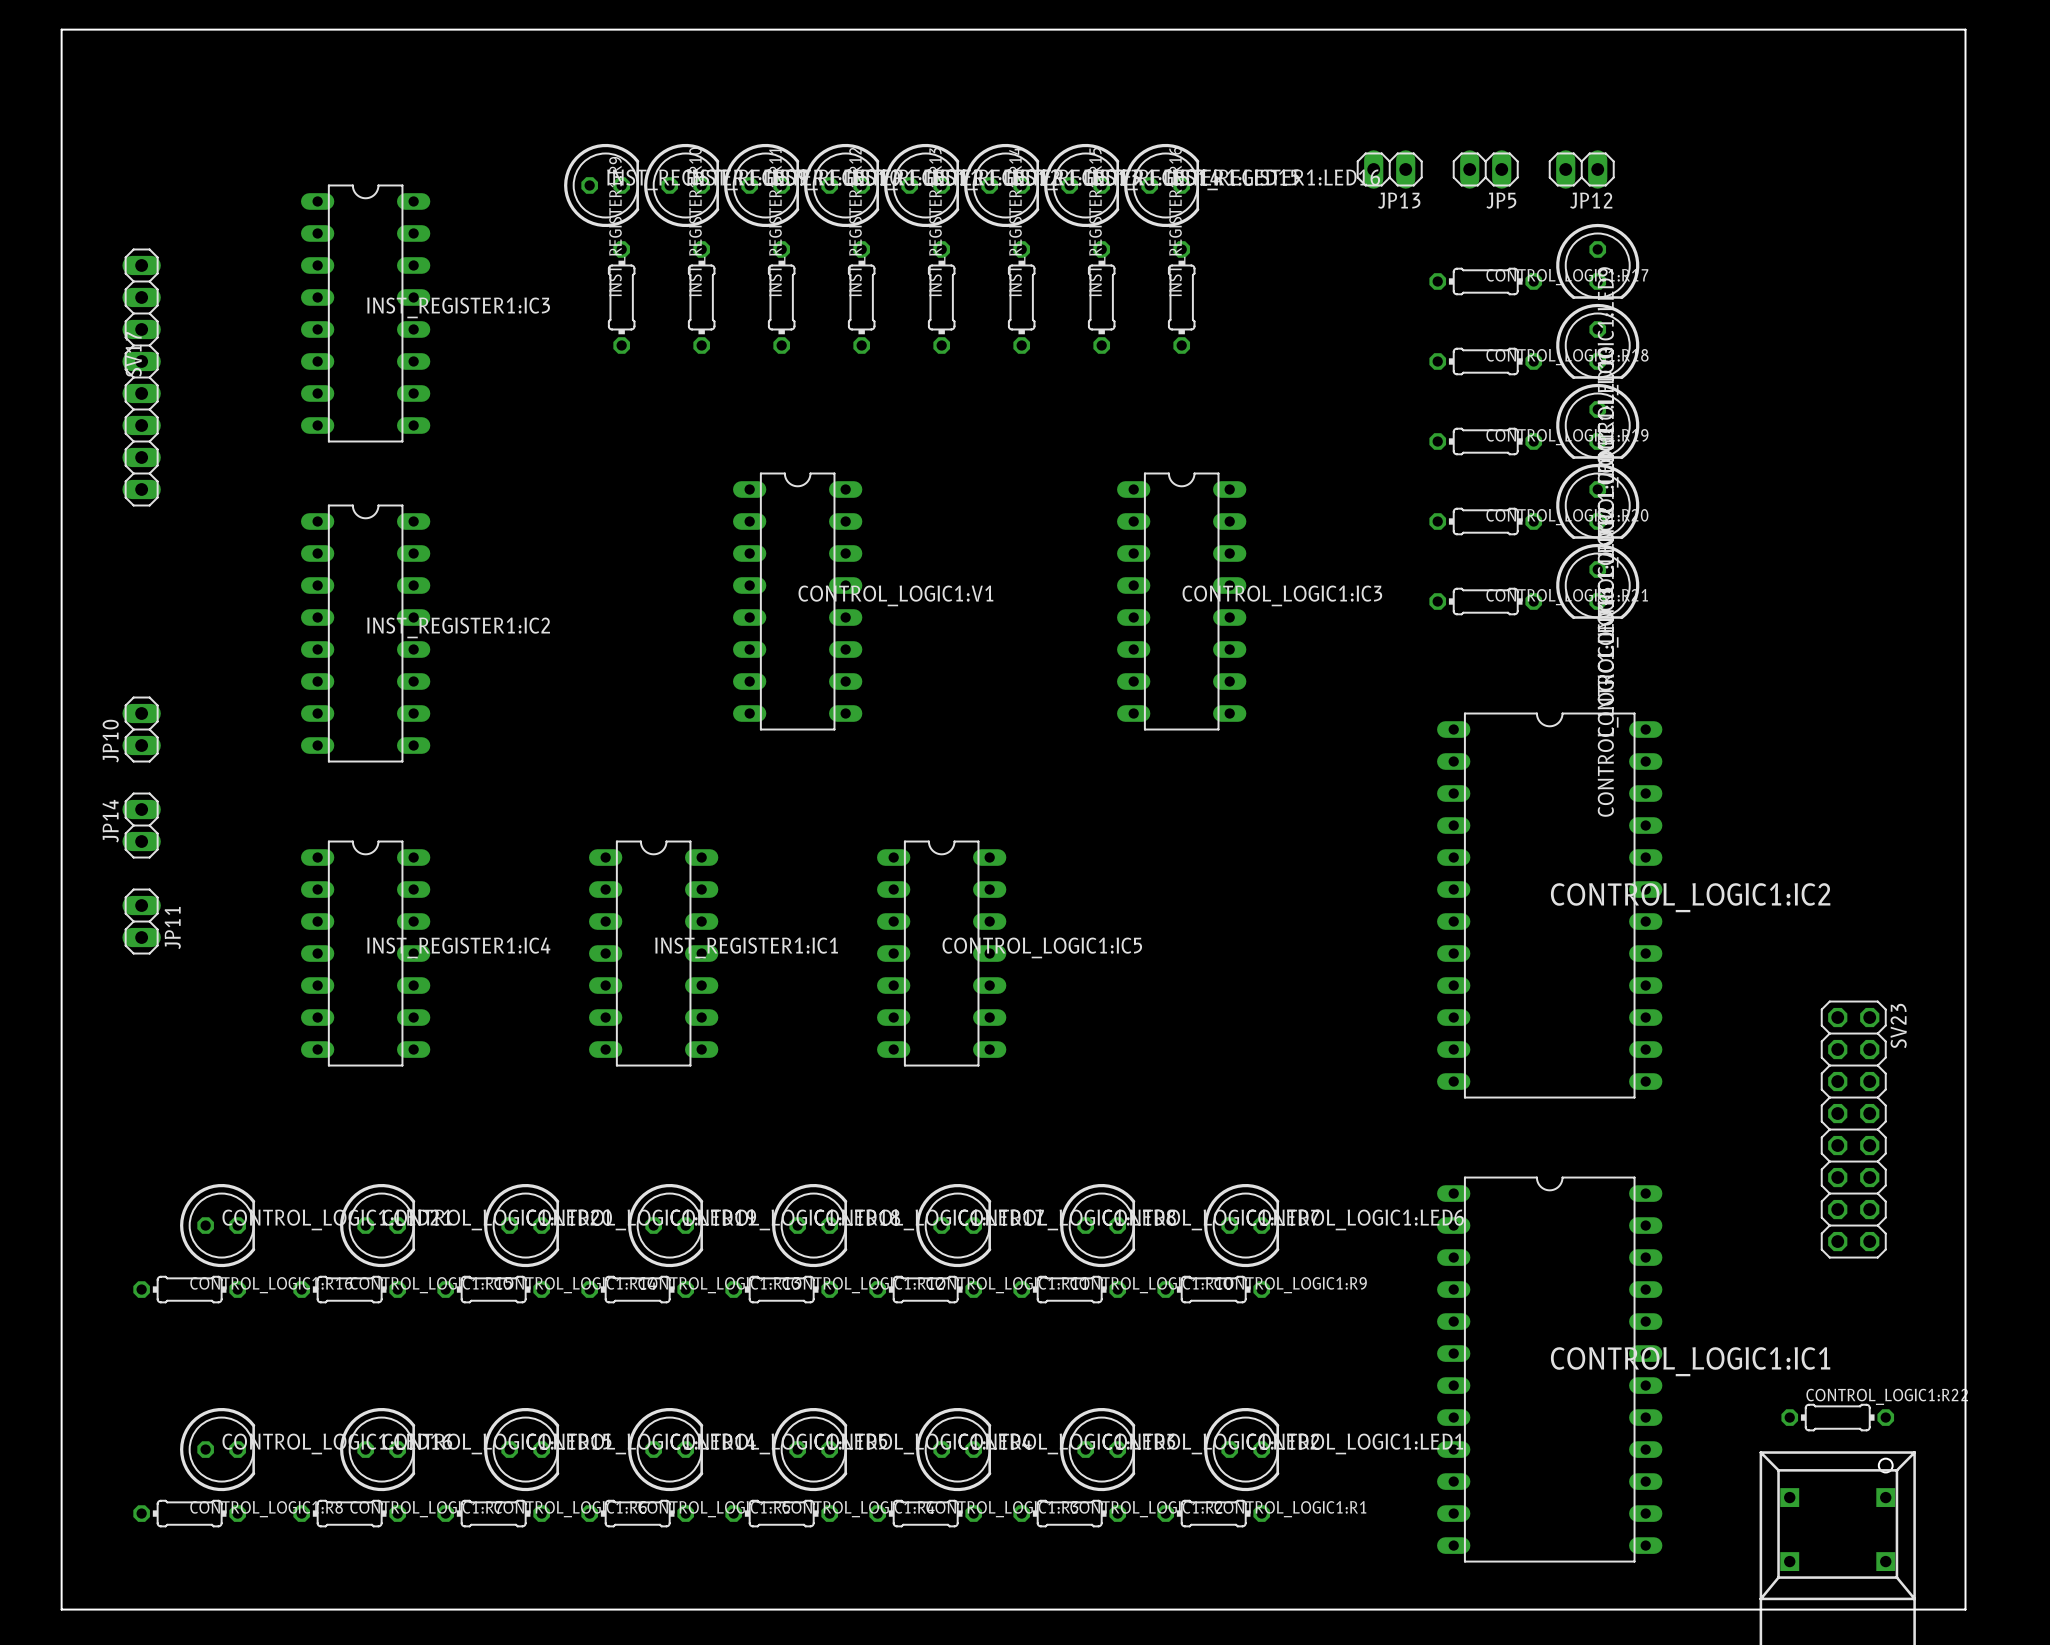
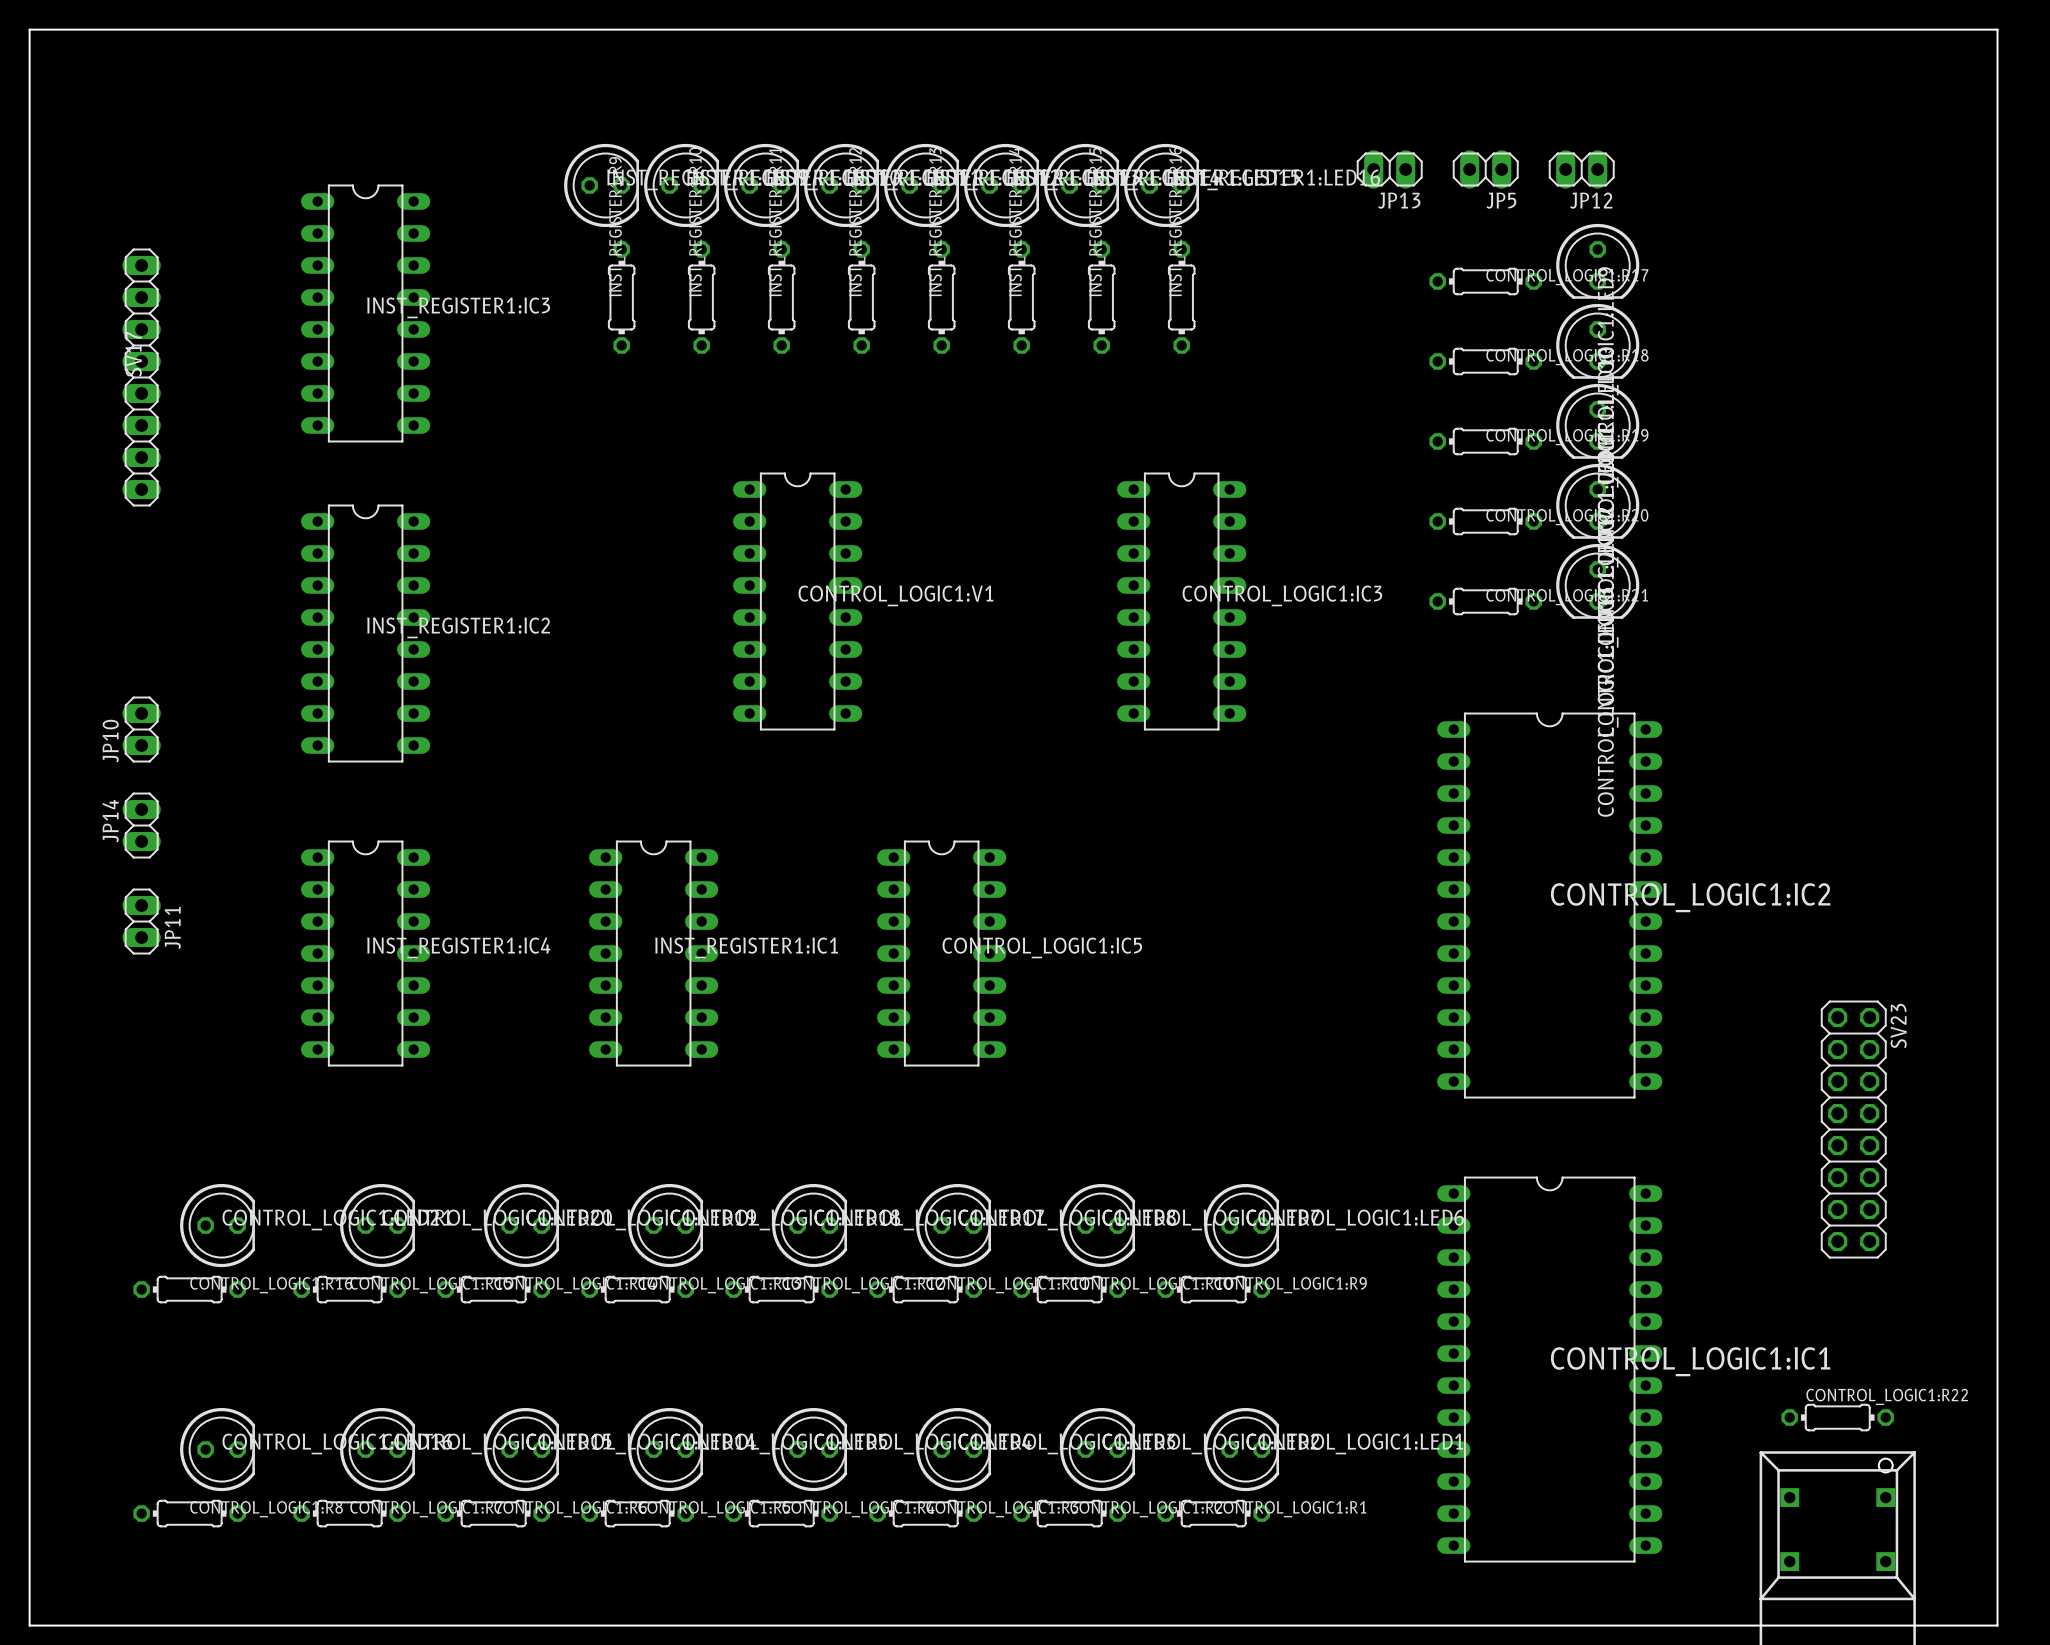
board edge: (61, 29) (61, 1609) (1965, 1609) (1965, 29) -> (61, 29) (29, 29) (29, 1625) (1997, 1625) (1997, 29) (1965, 29)

